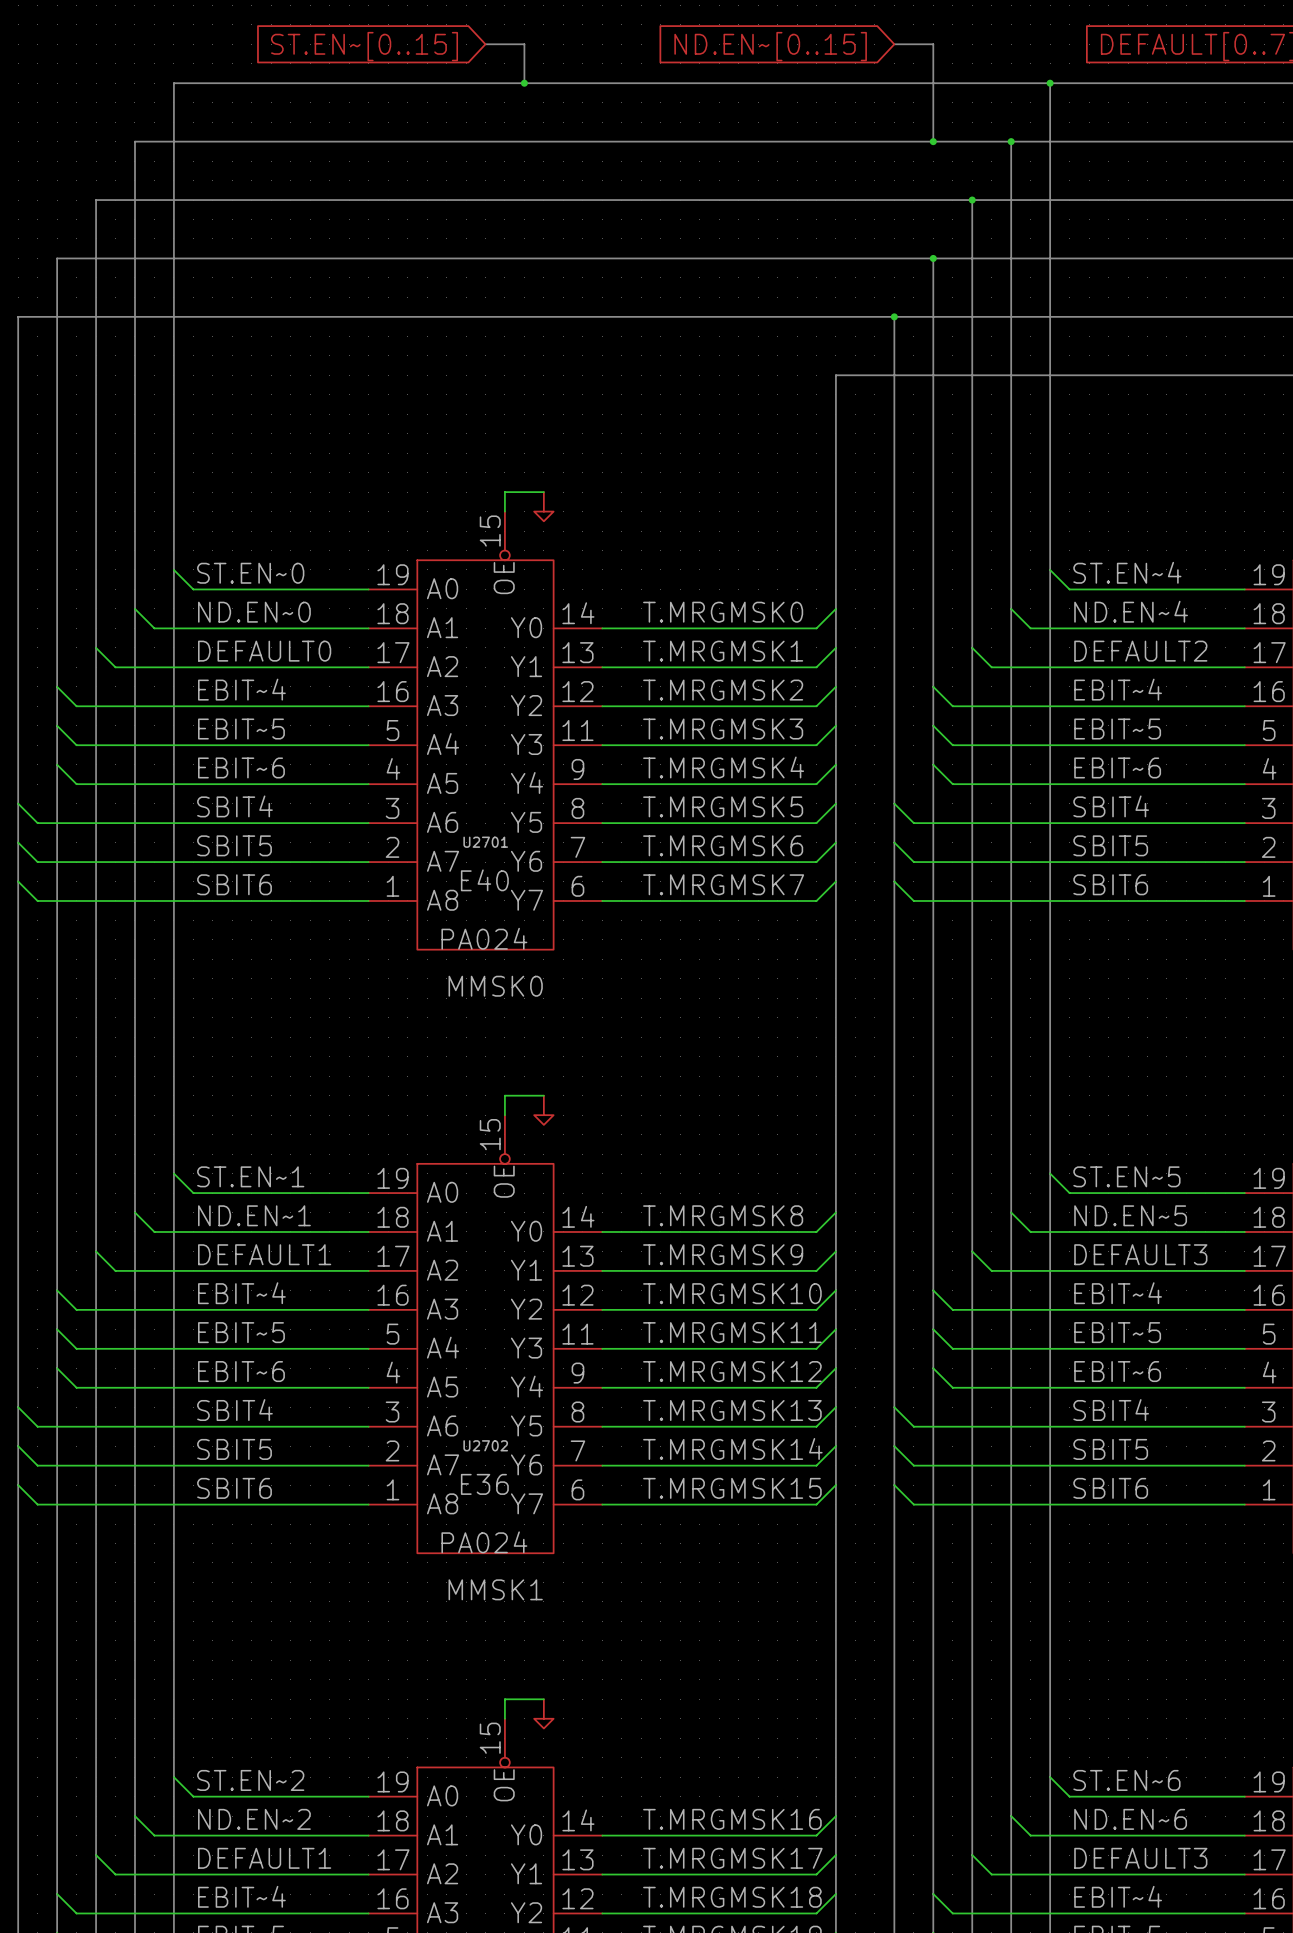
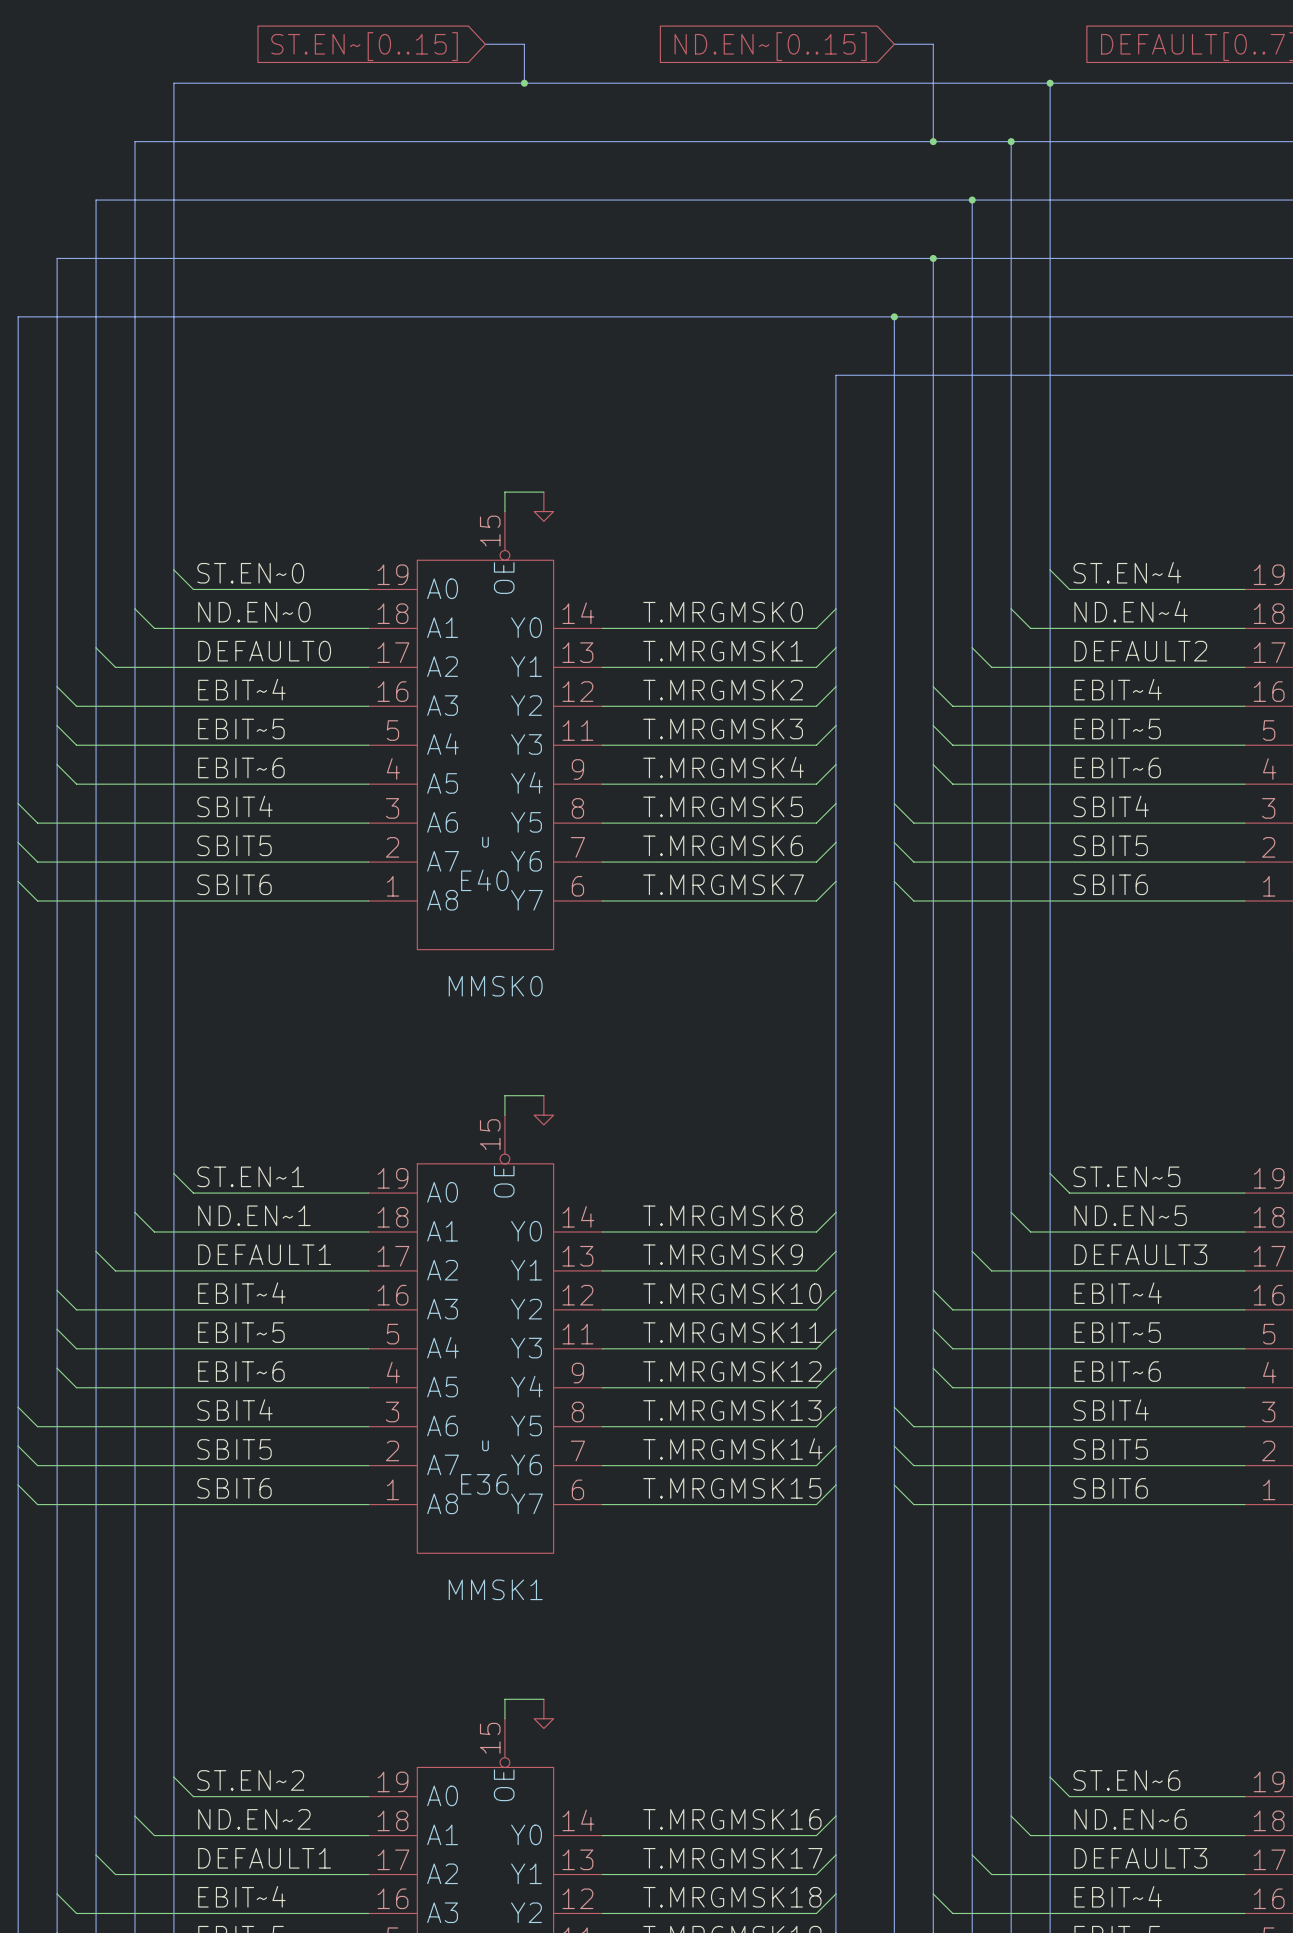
U2701 name: U2701 (485, 842) -> U (485, 842)
U2701 value: PA024 (484, 938) -> none
U2702 name: U2702 (485, 1445) -> U (485, 1445)
U2702 value: PA024 (484, 1542) -> none

